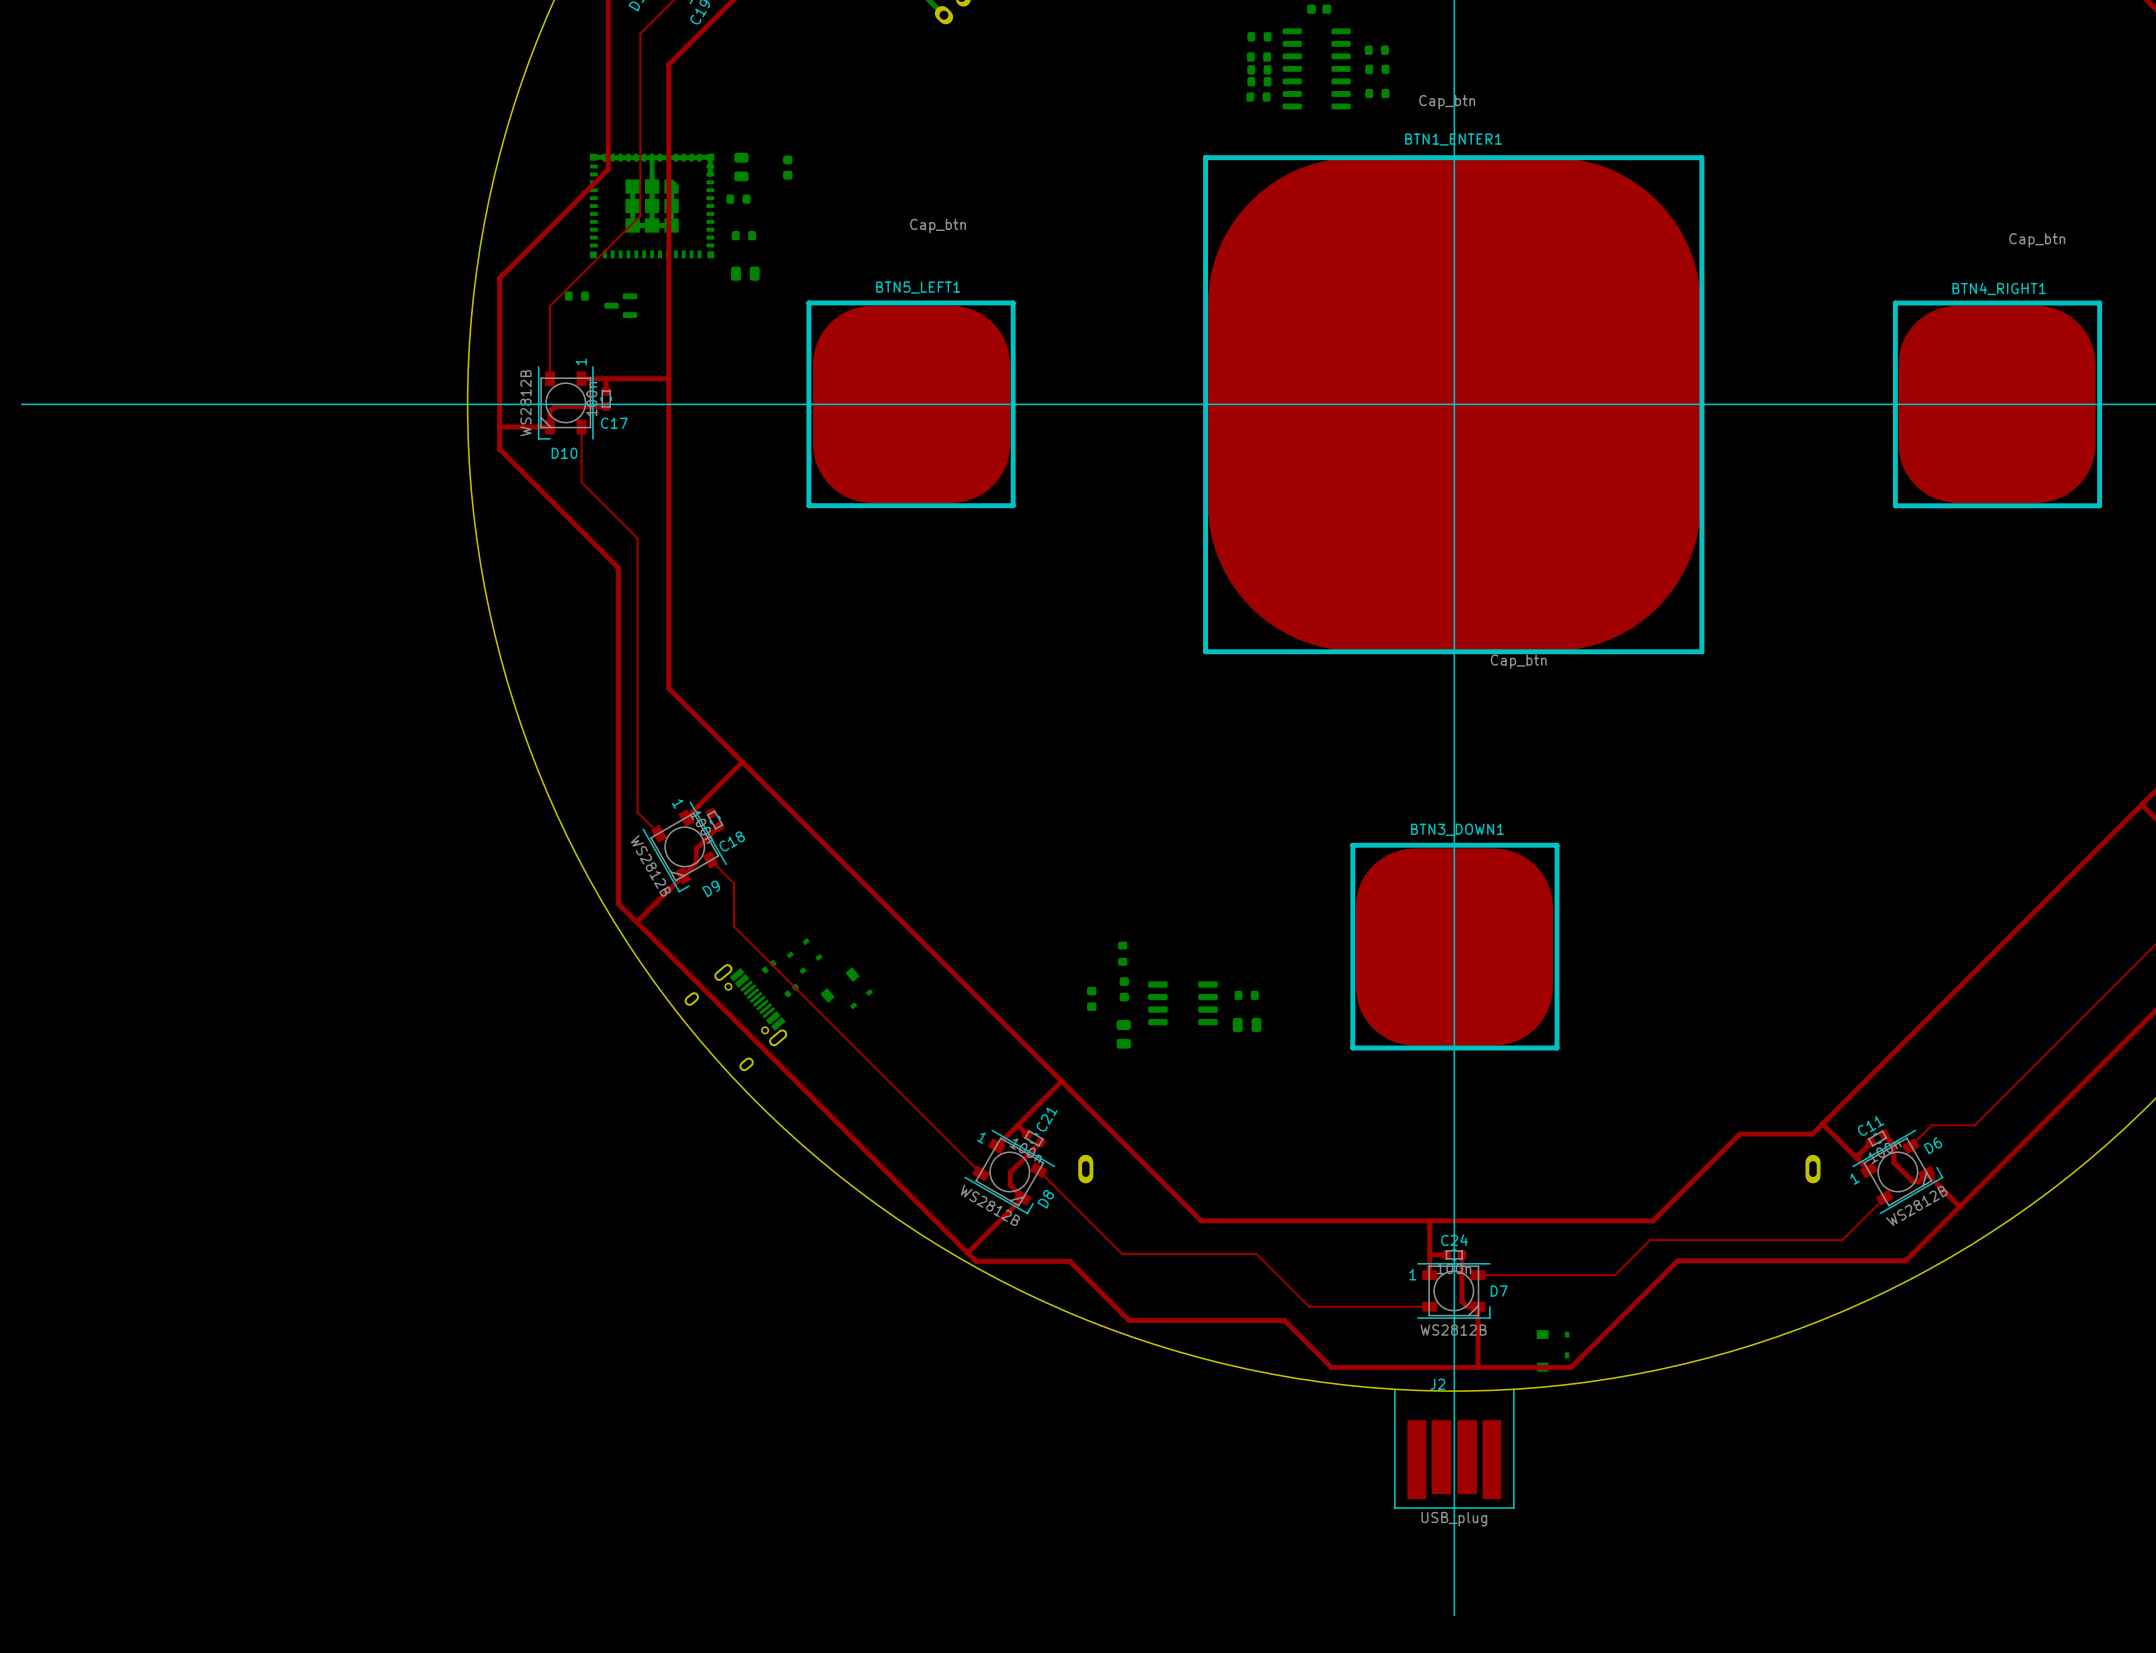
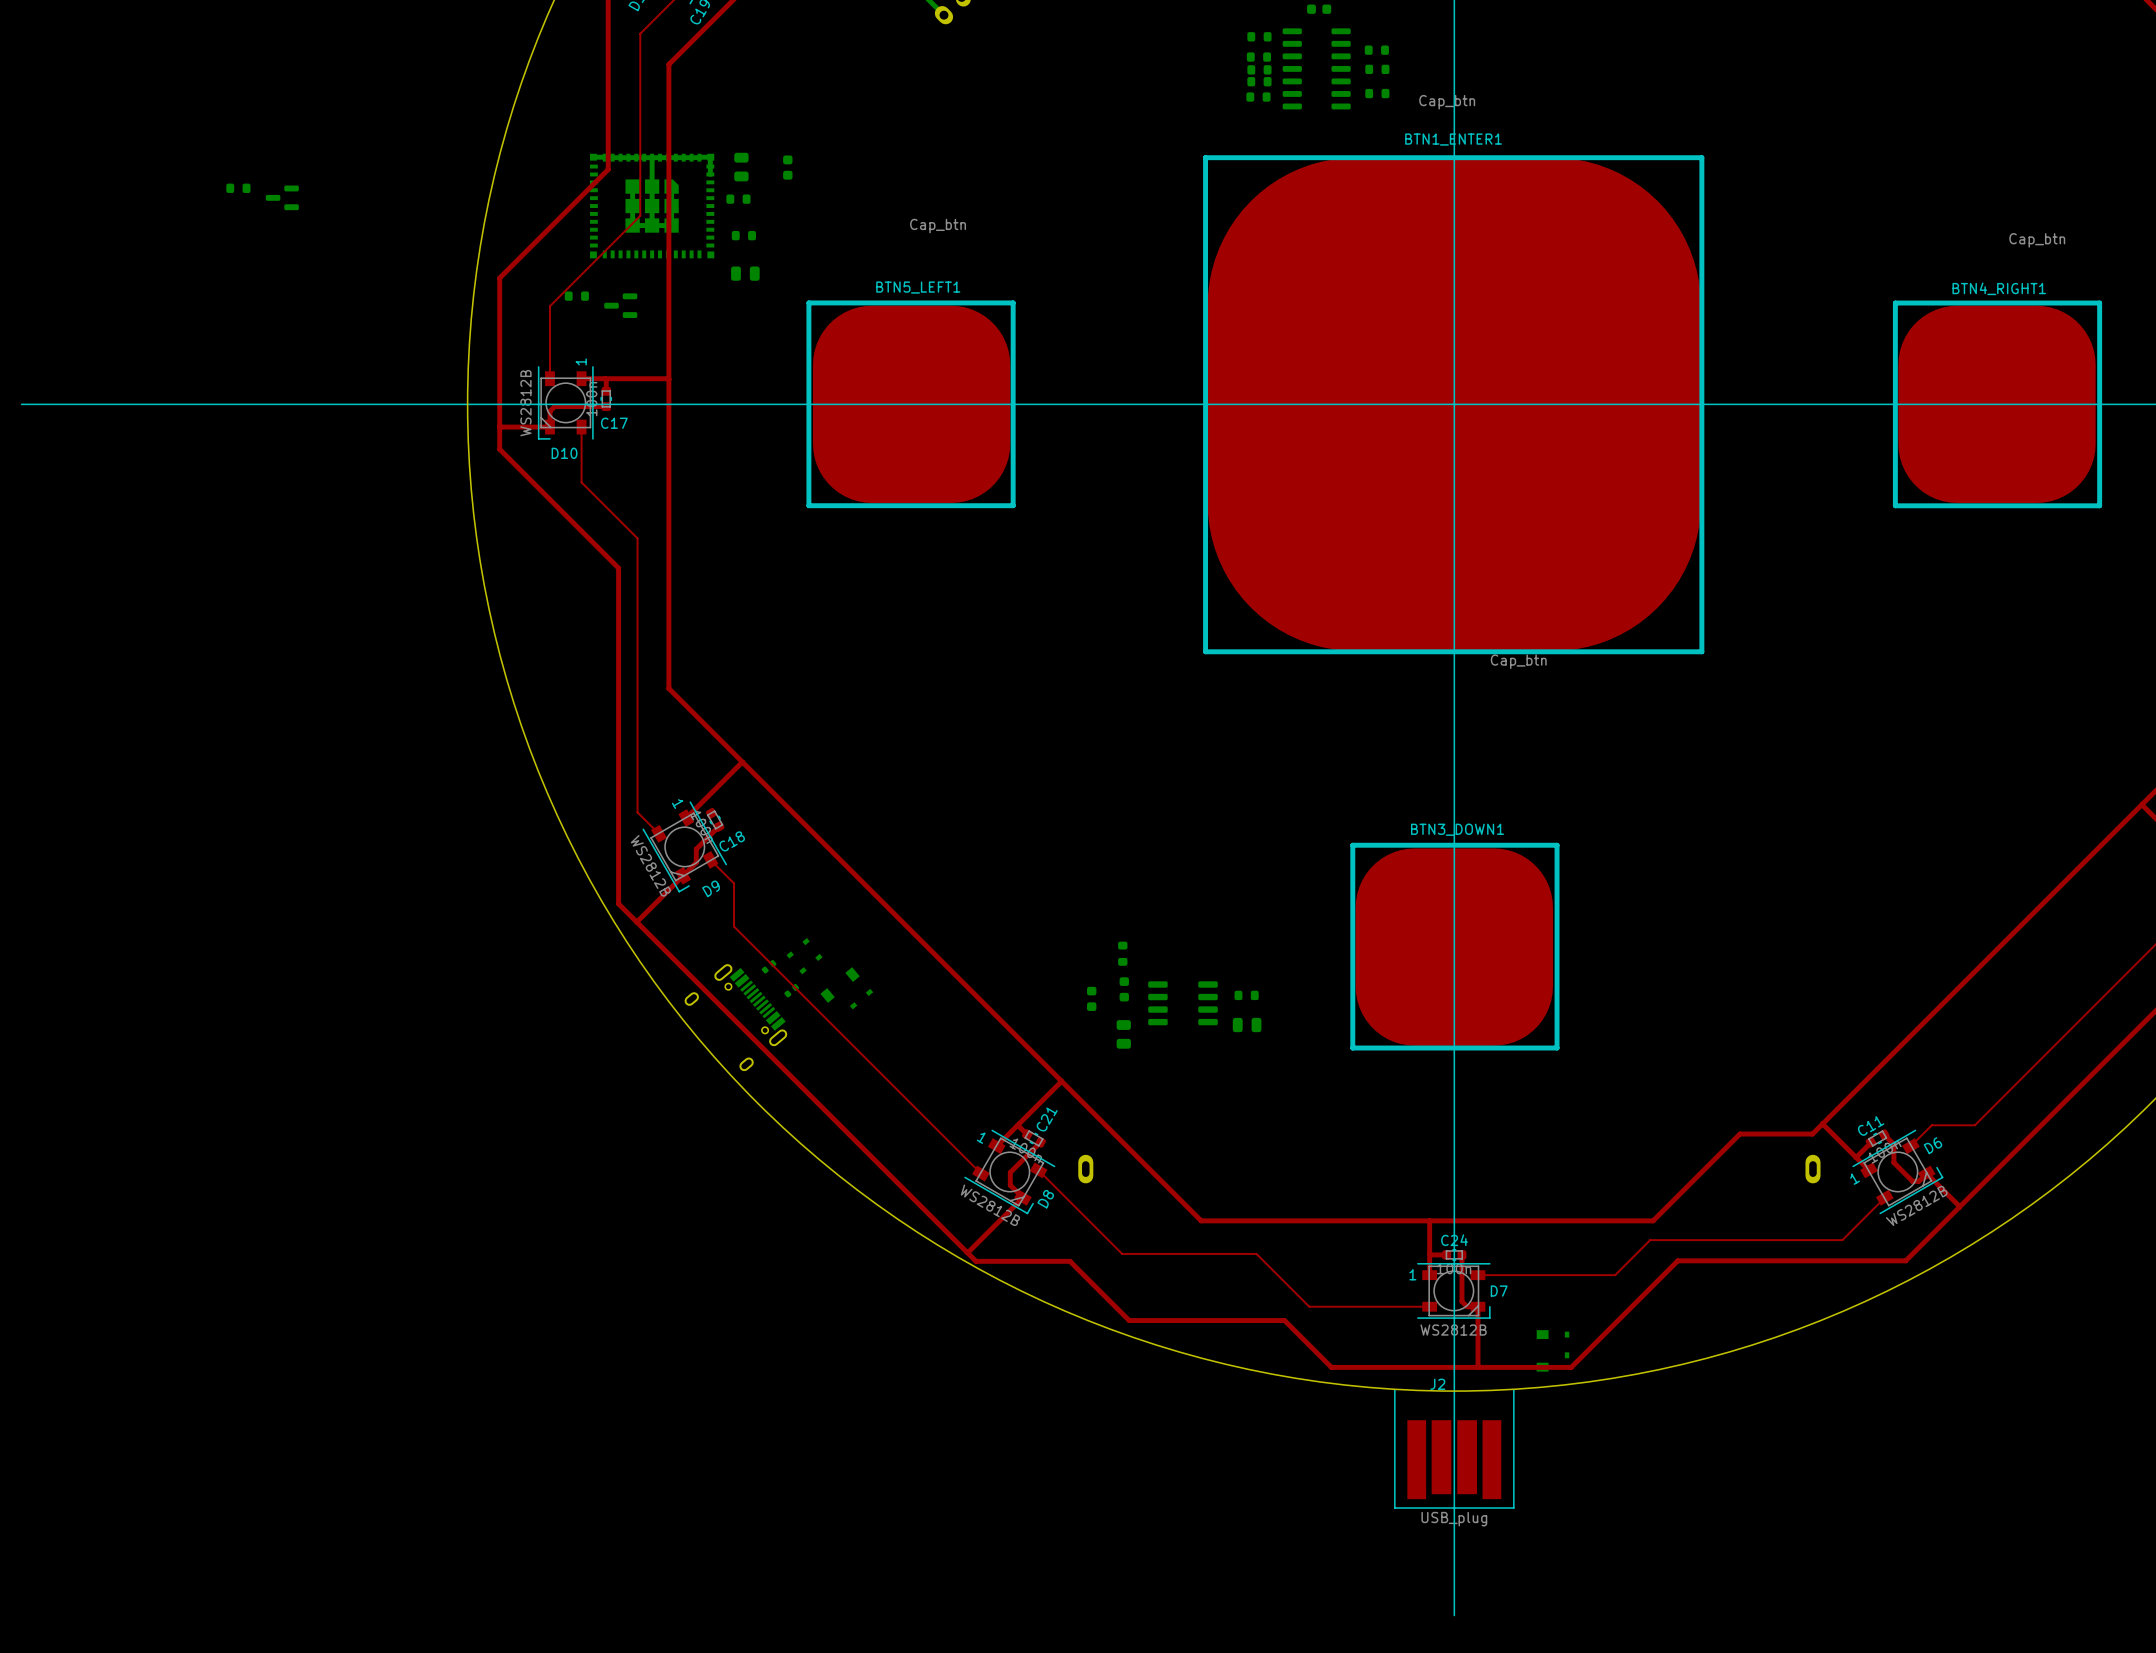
part: none -> (238, 188)
part: none -> (282, 197)

